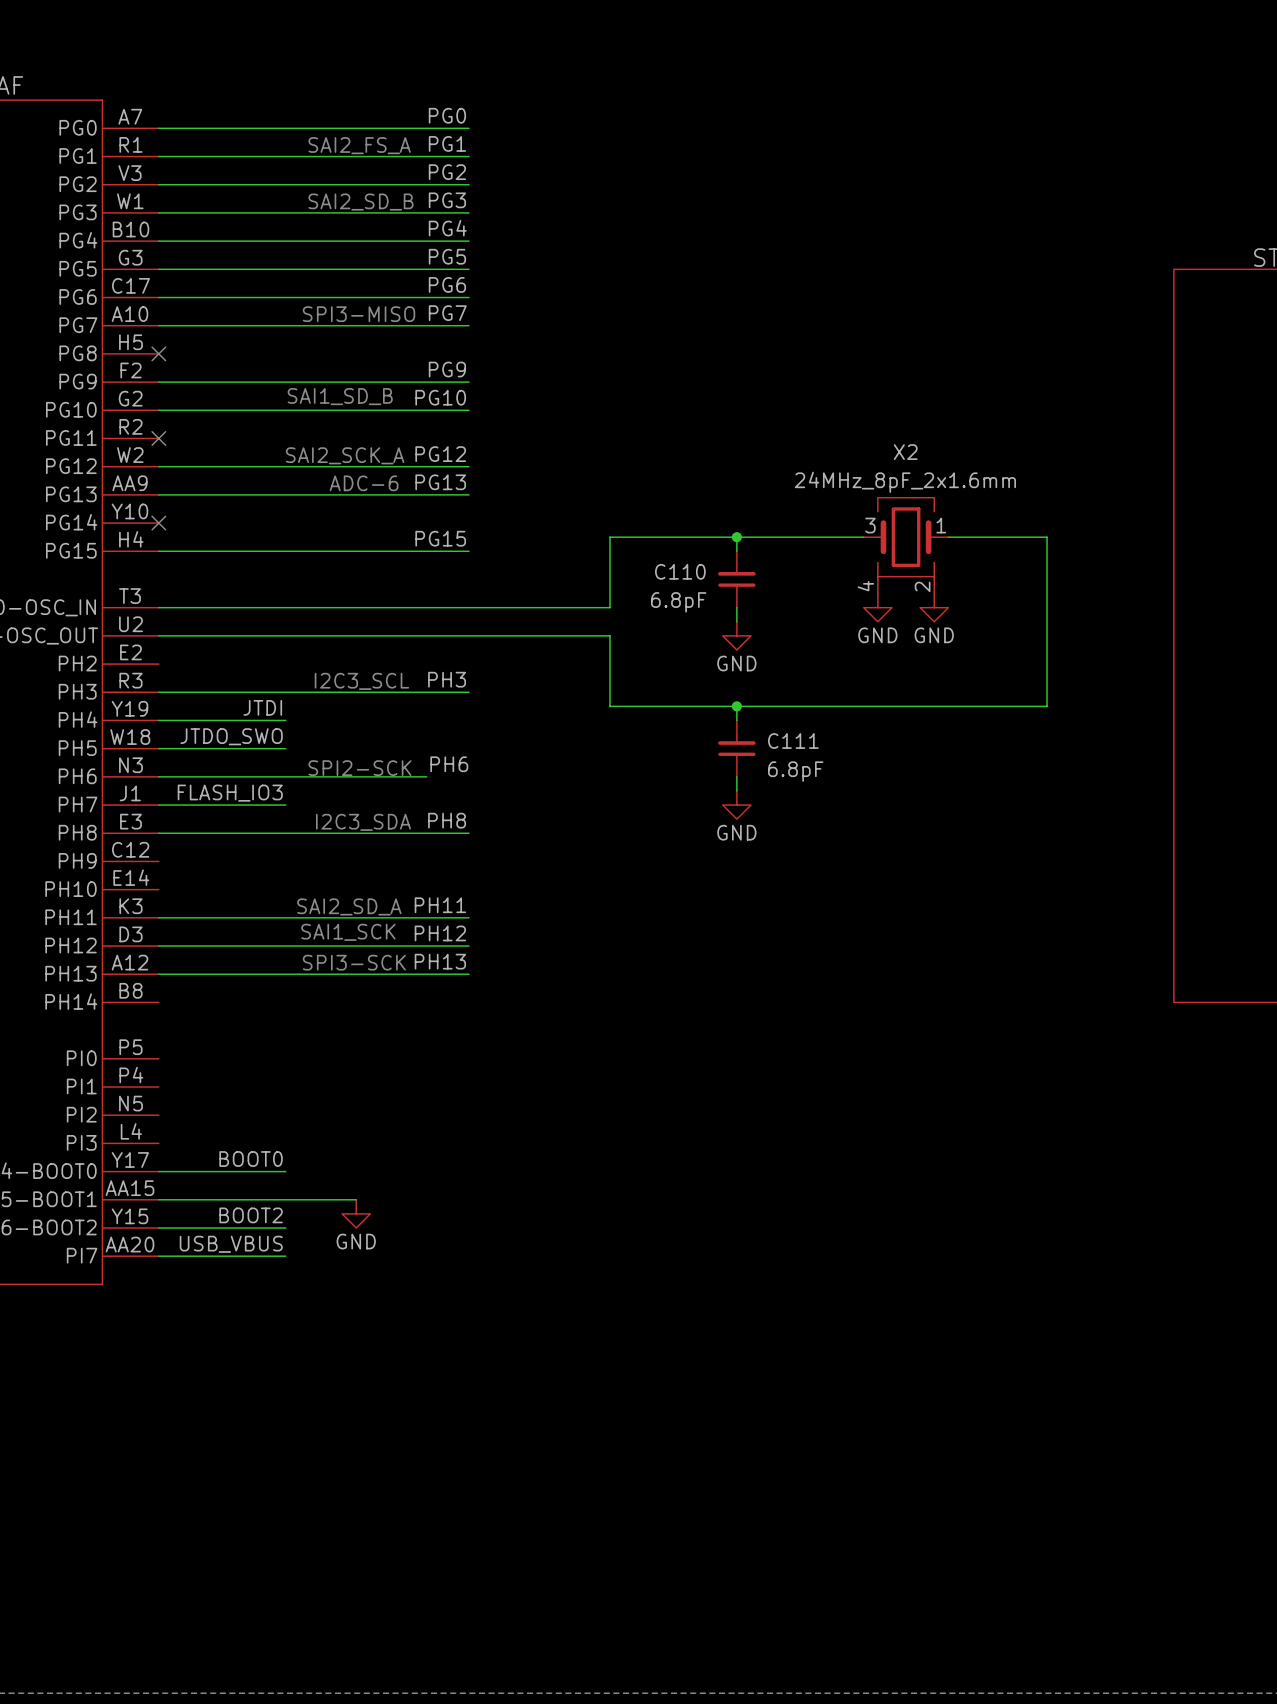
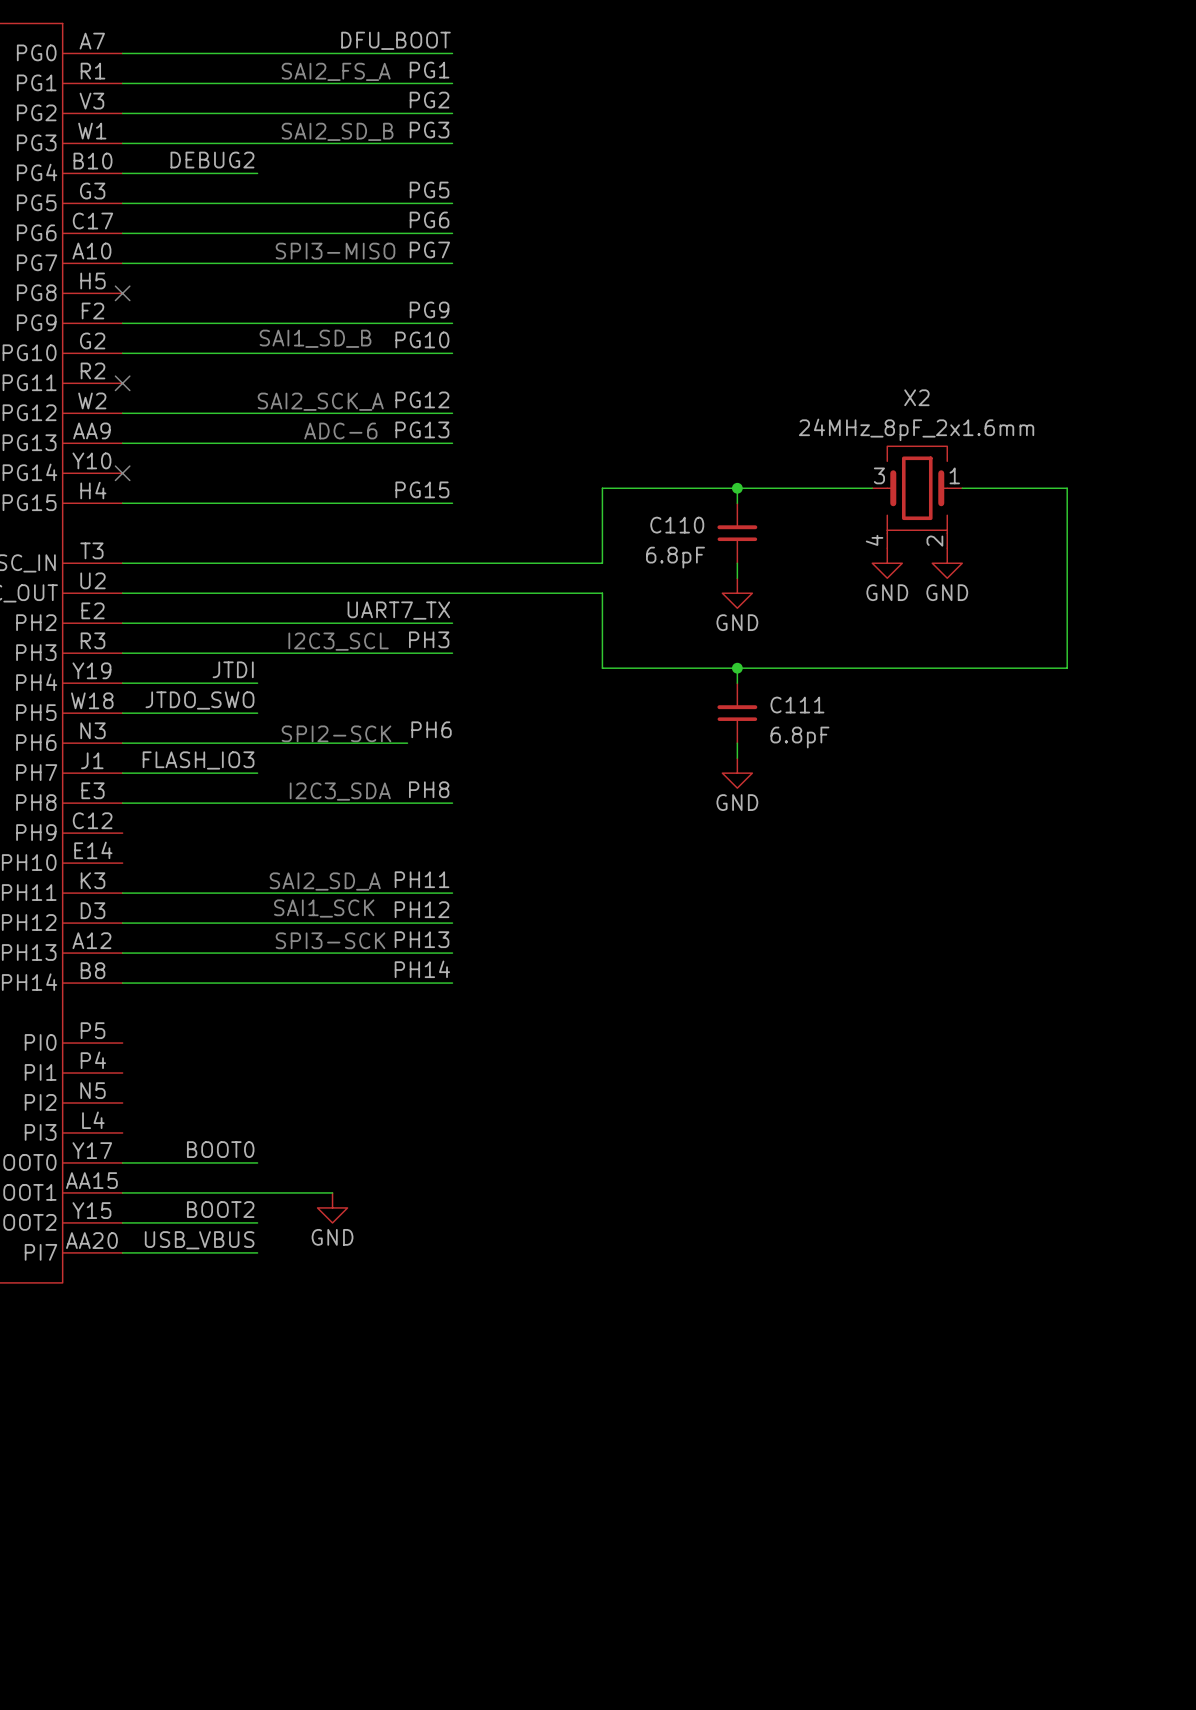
label: PG0 (447, 115) -> DFU_BOOT (395, 40)
label: none -> DEBUG2 (212, 160)
label: PG4 (447, 228) -> none
wire: (285, 241) (469, 241) -> none
label: none -> UART7_TX (398, 610)
wire: none -> (122, 623) (452, 623)
label: none -> PH14 (422, 969)
wire: none -> (122, 983) (452, 983)

